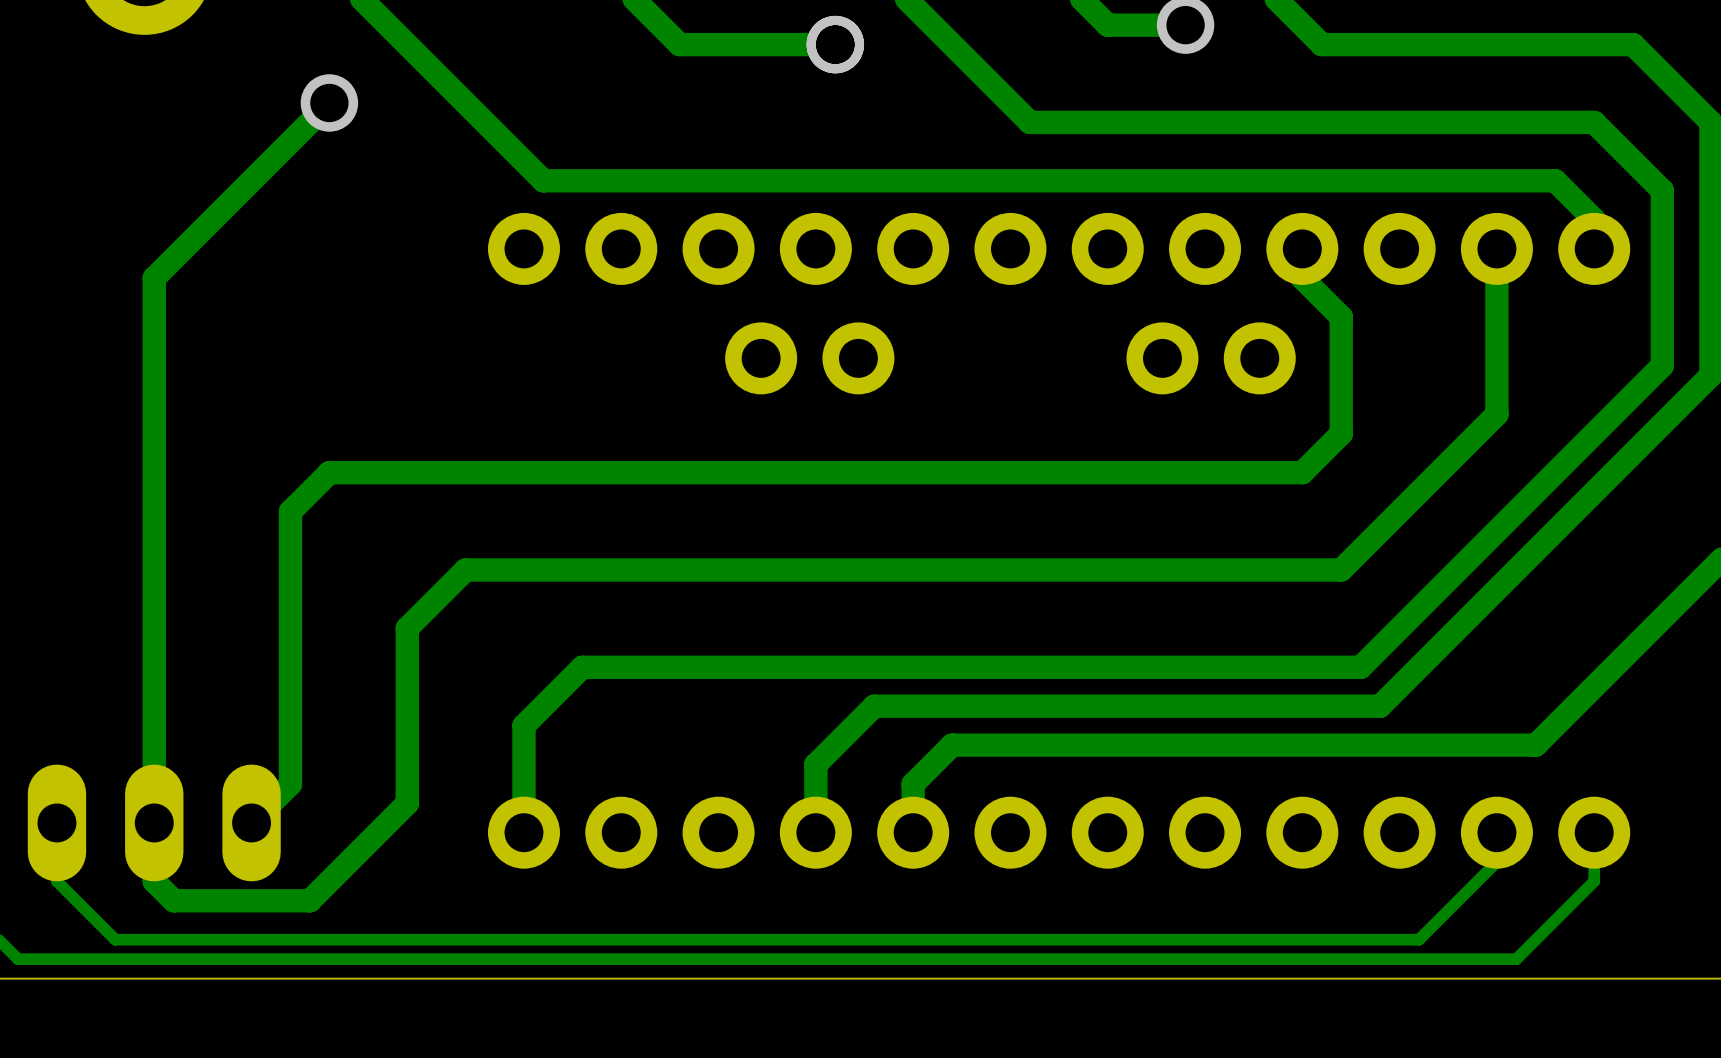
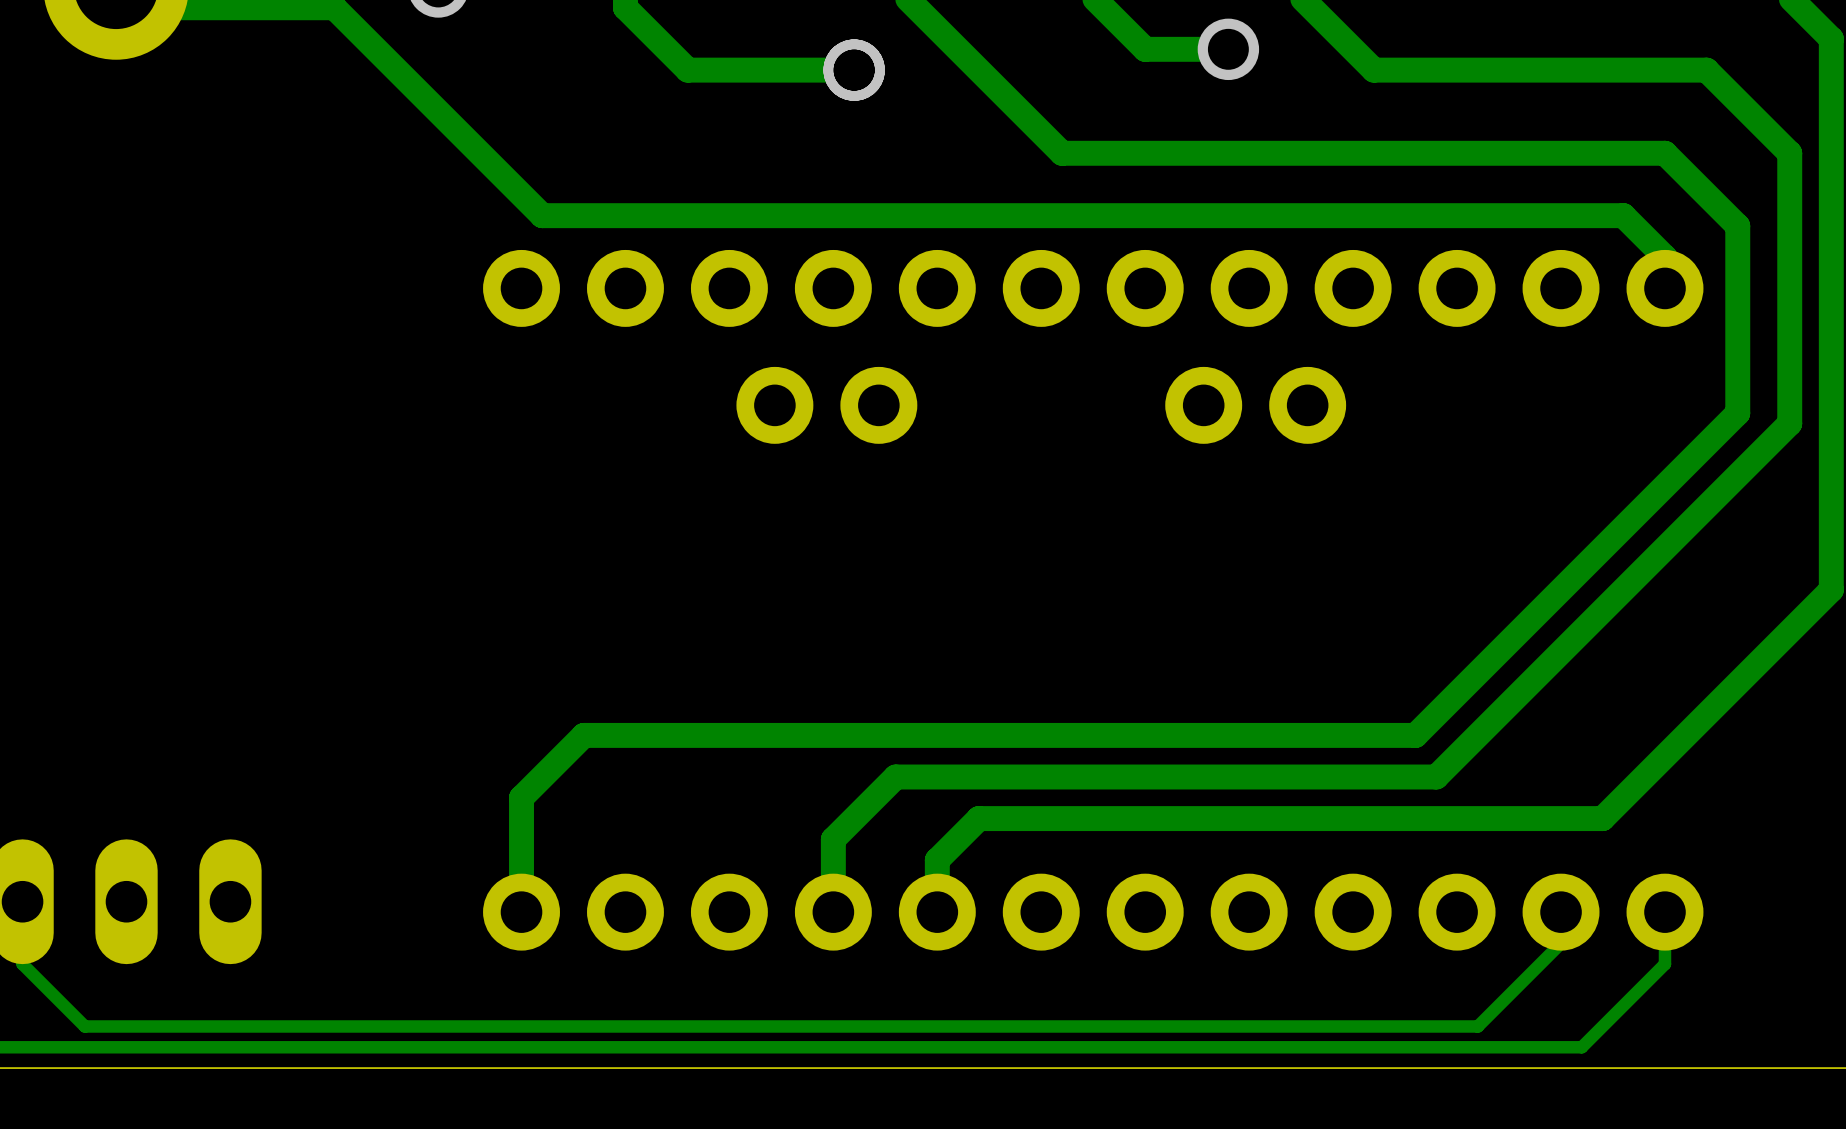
track: (329, 102) (154, 278) (154, 881) (173, 900) (309, 900) (407, 803) (407, 628) (465, 569) (1341, 569) (1496, 414) (1496, 248) -> none
via: (329, 102) -> none
track: (1302, 248) (1302, 278) (1341, 317) (1341, 433) (1302, 472) (329, 472) (290, 511) (290, 784) (251, 822) -> none

